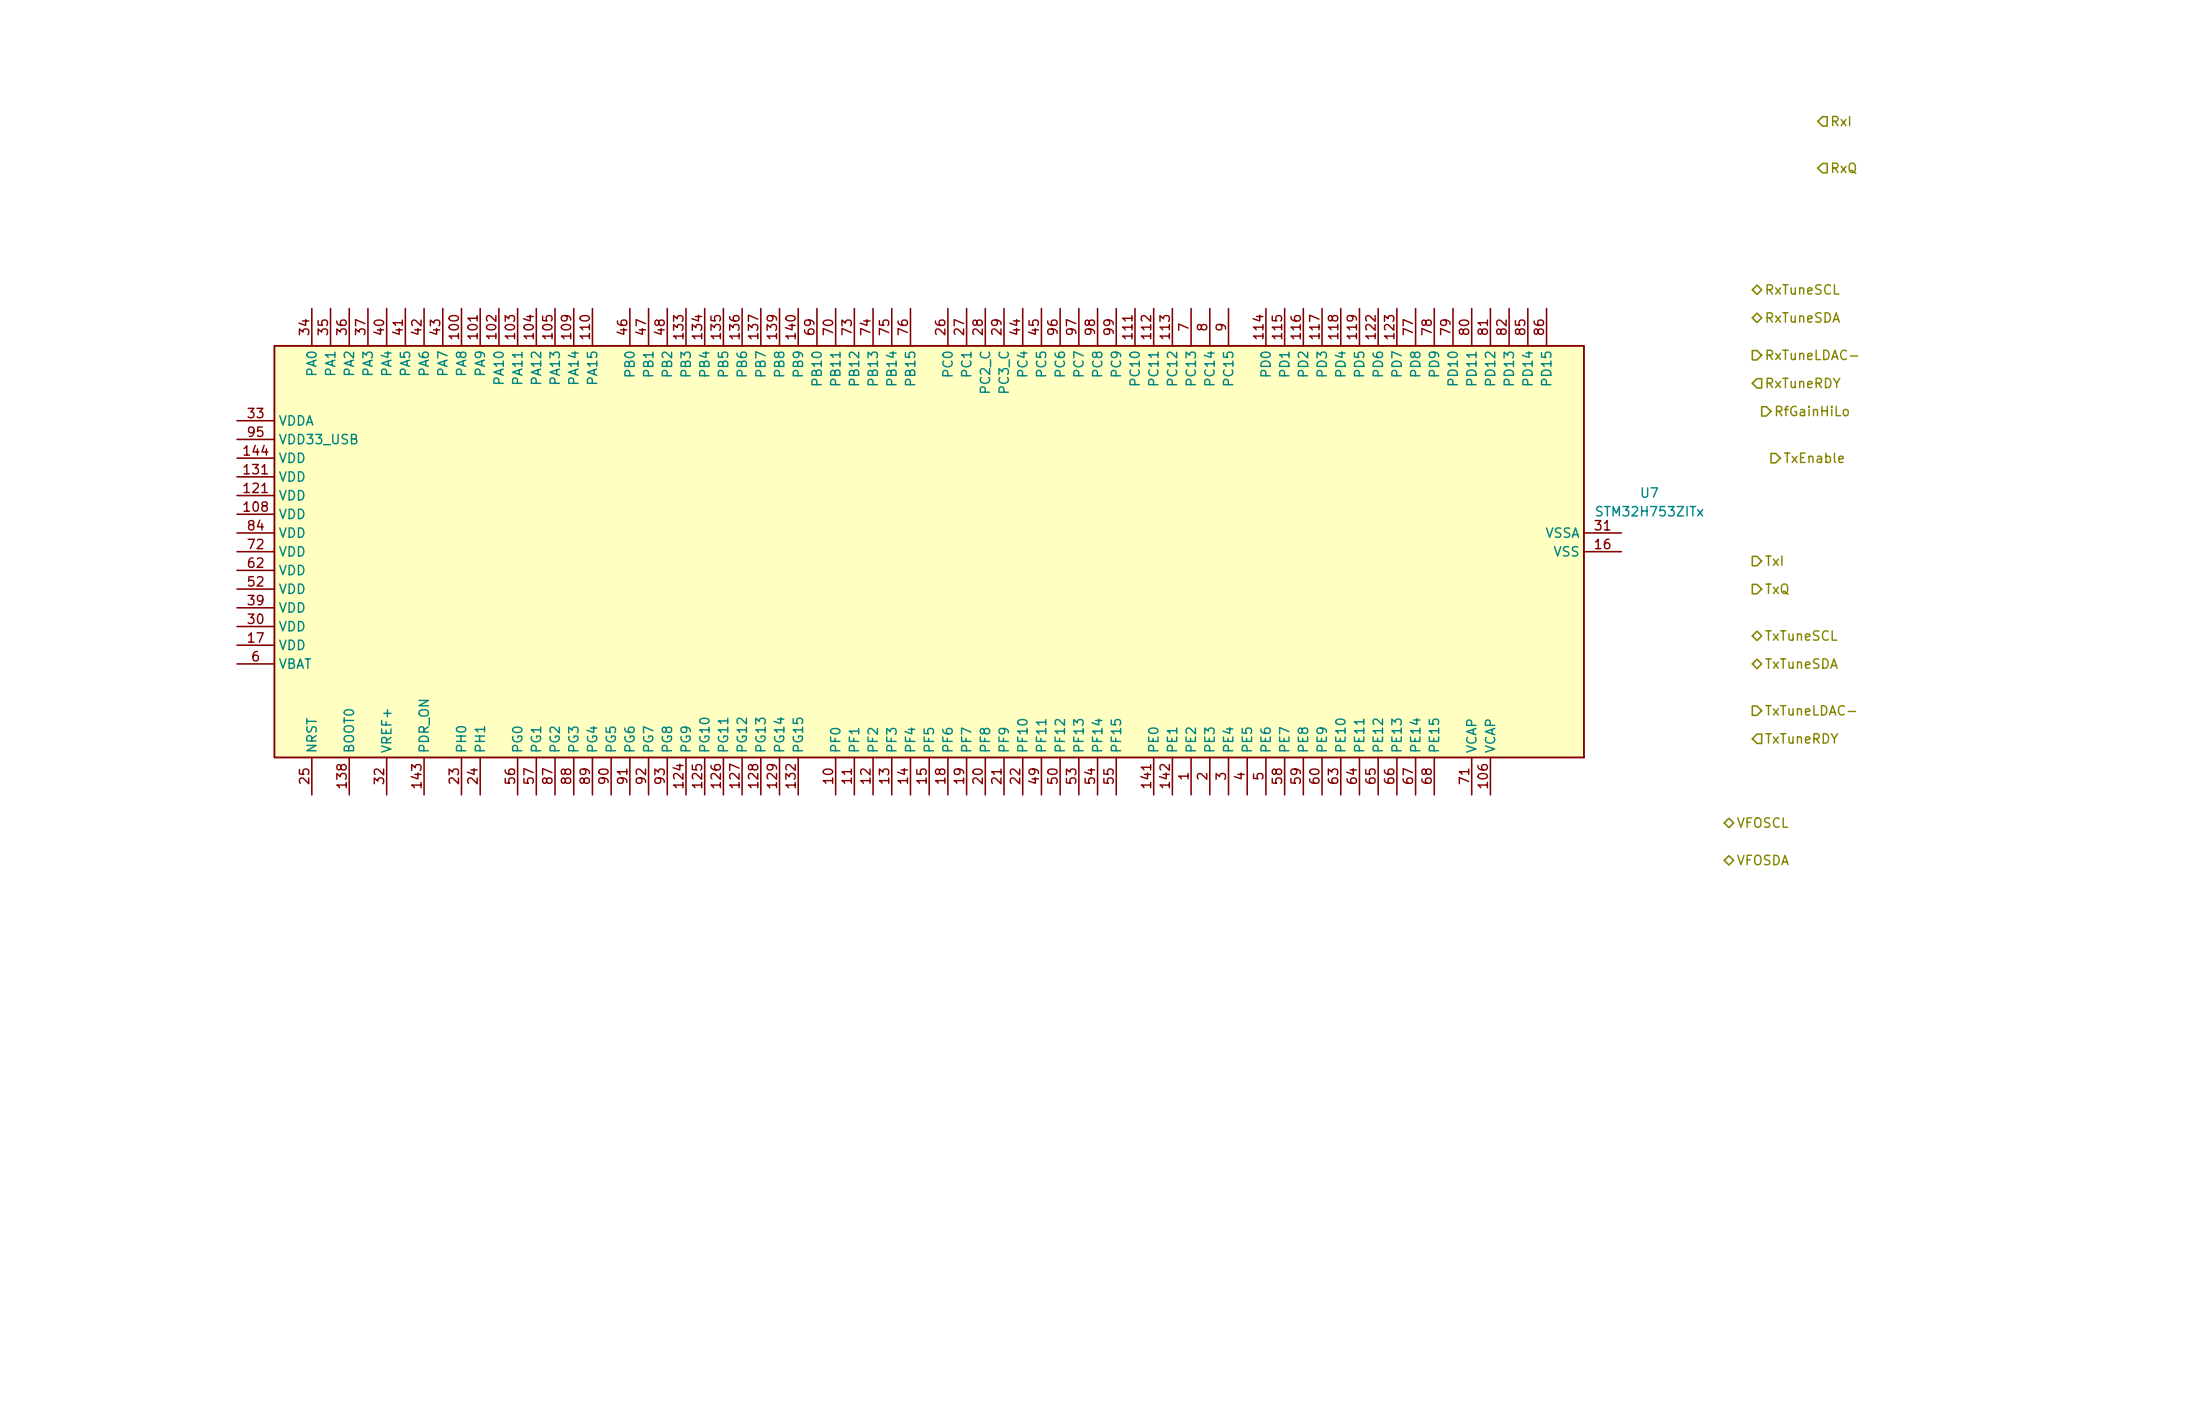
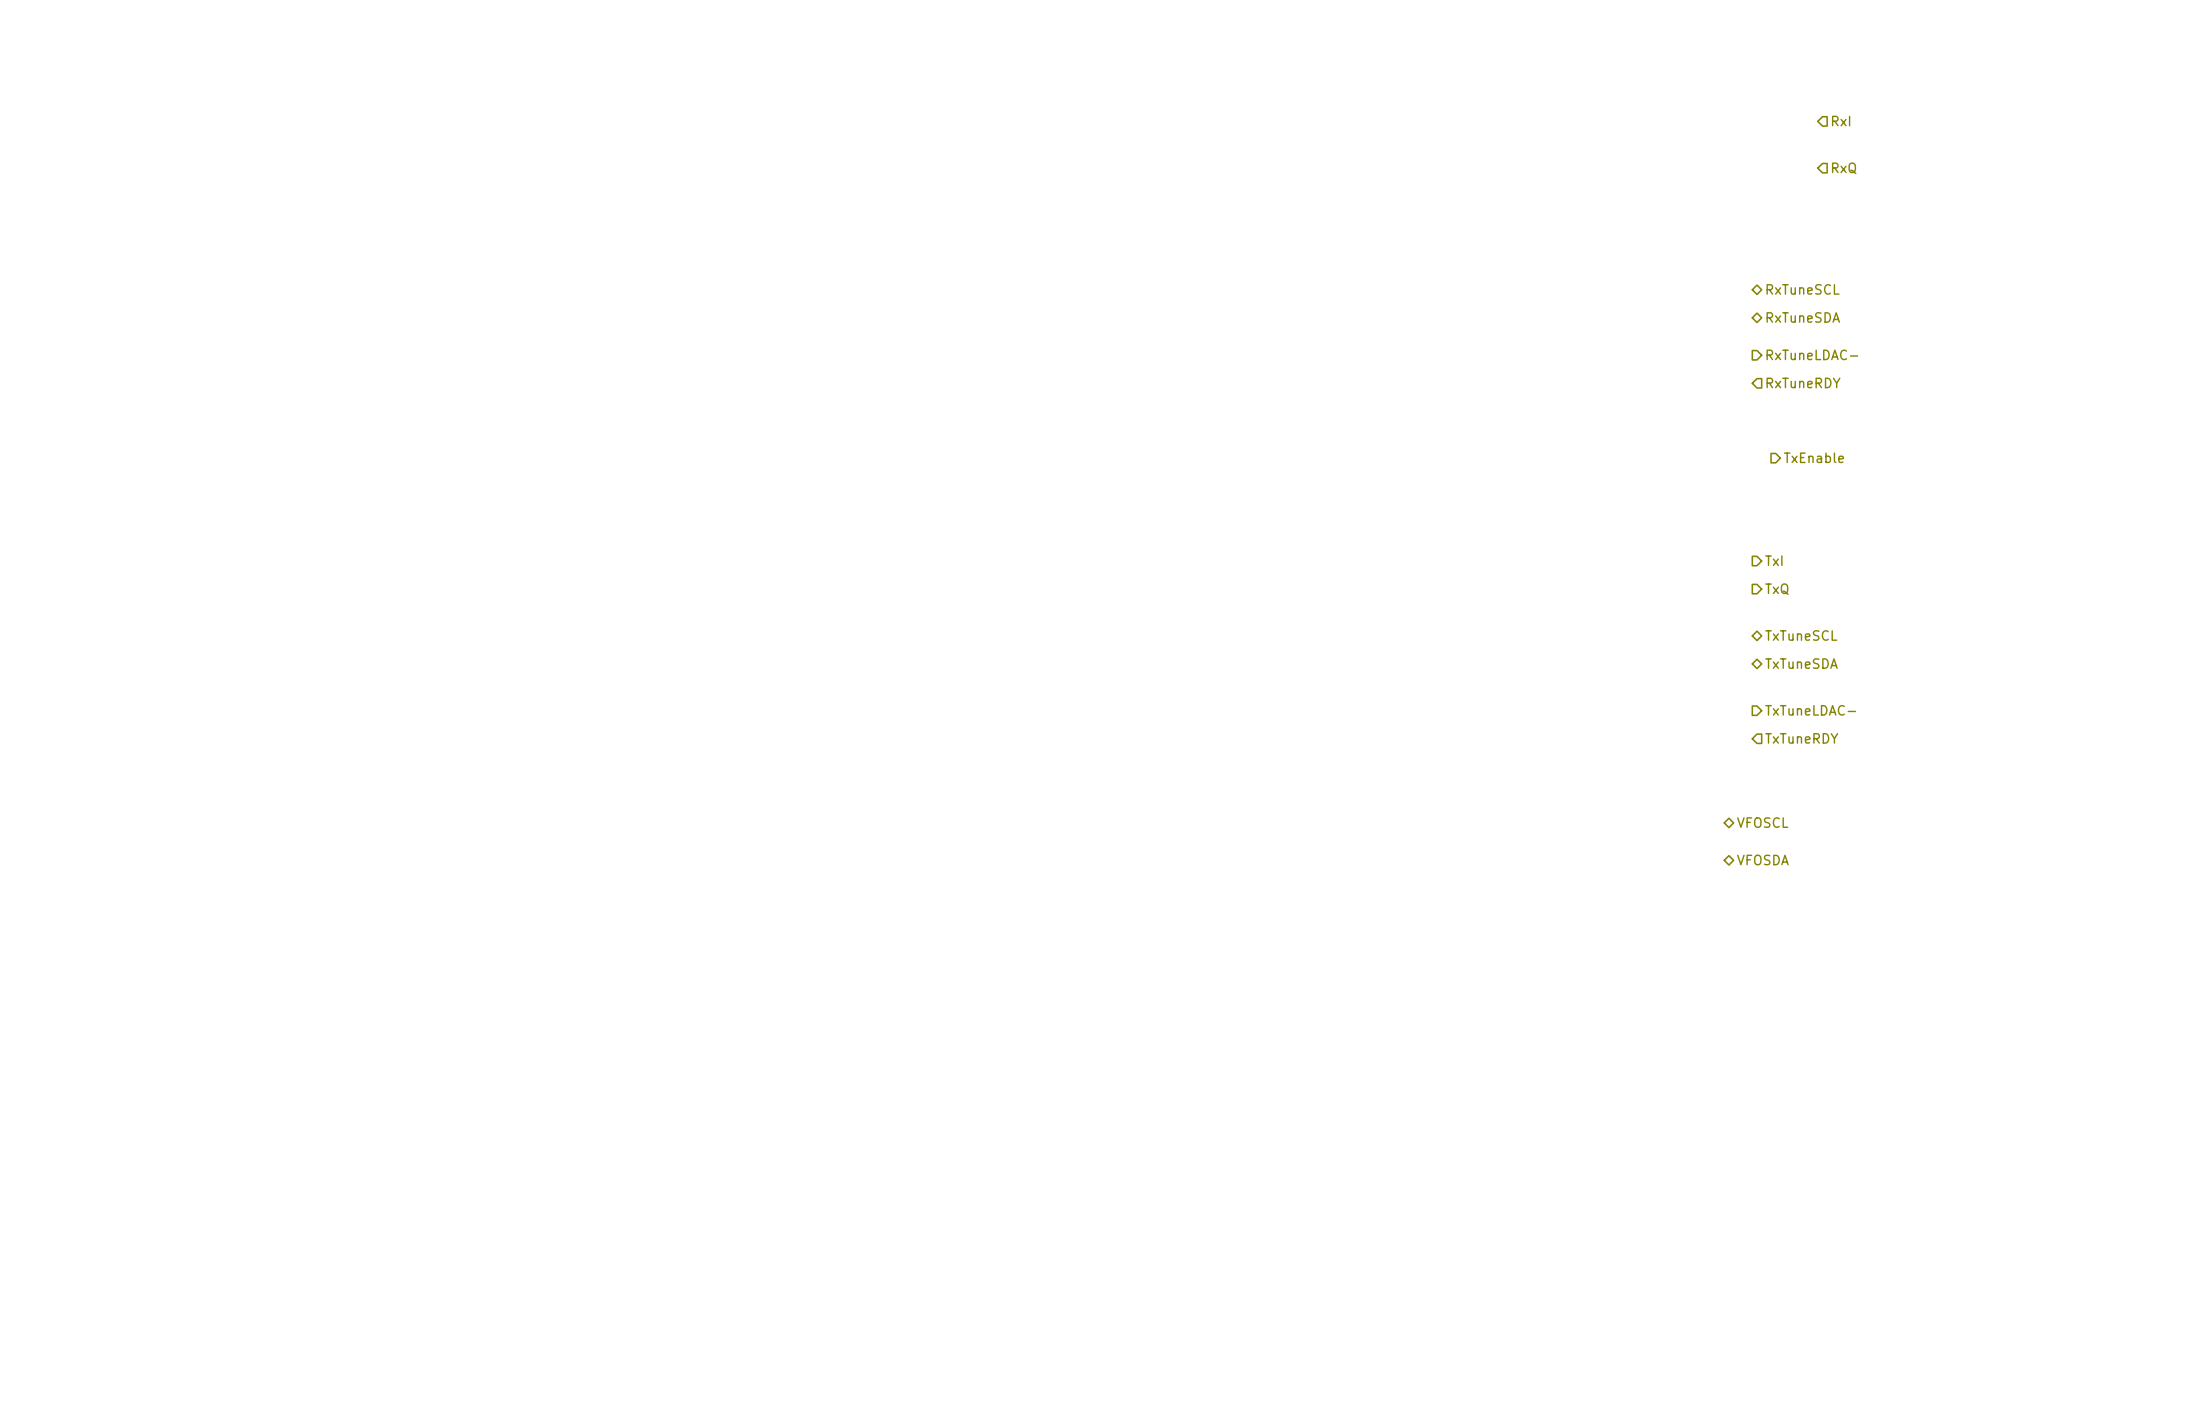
hierarchical label: RfGainHiLo (1812, 411) -> none
U7: STM32H753ZITx (929, 551) -> none

